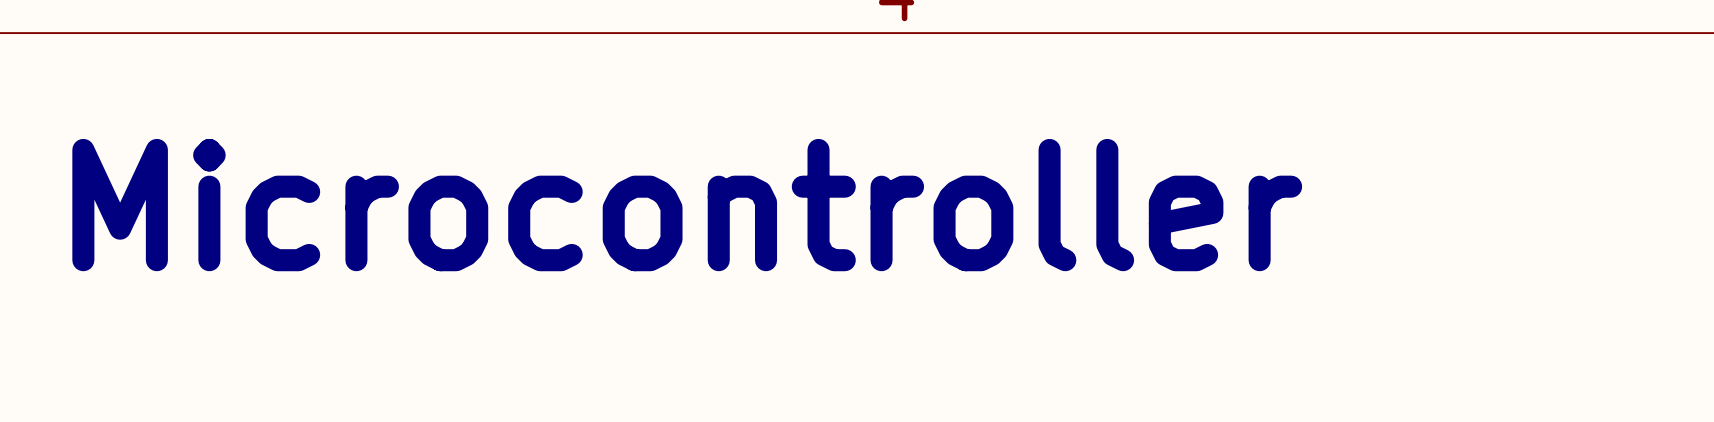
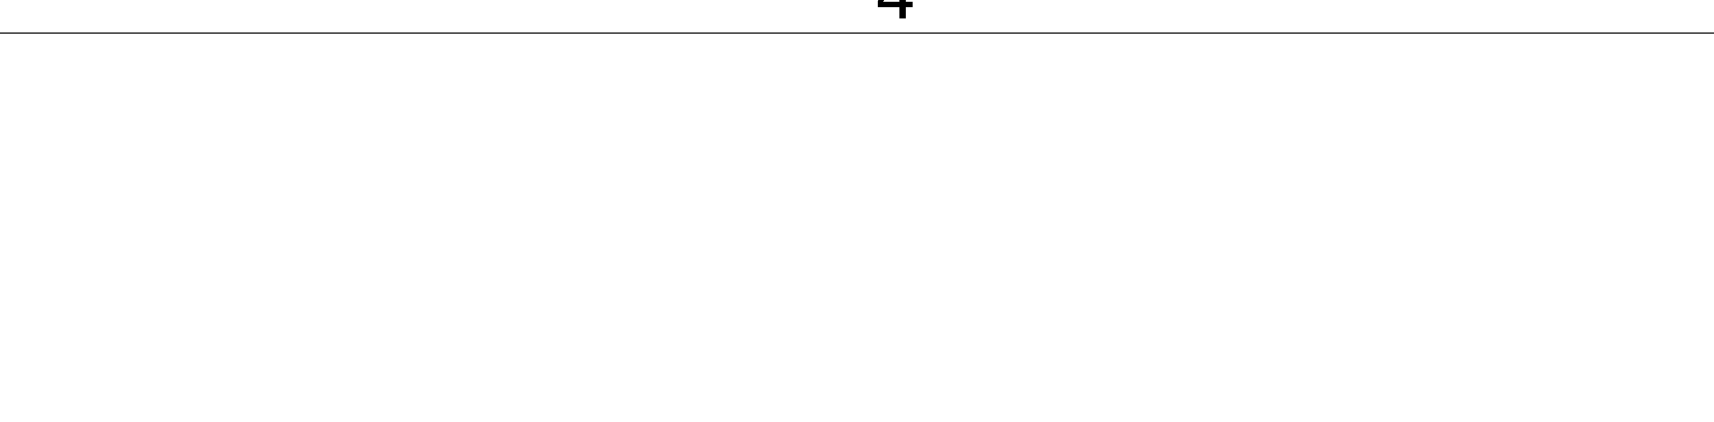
text: Microcontroller (687, 205) -> none

